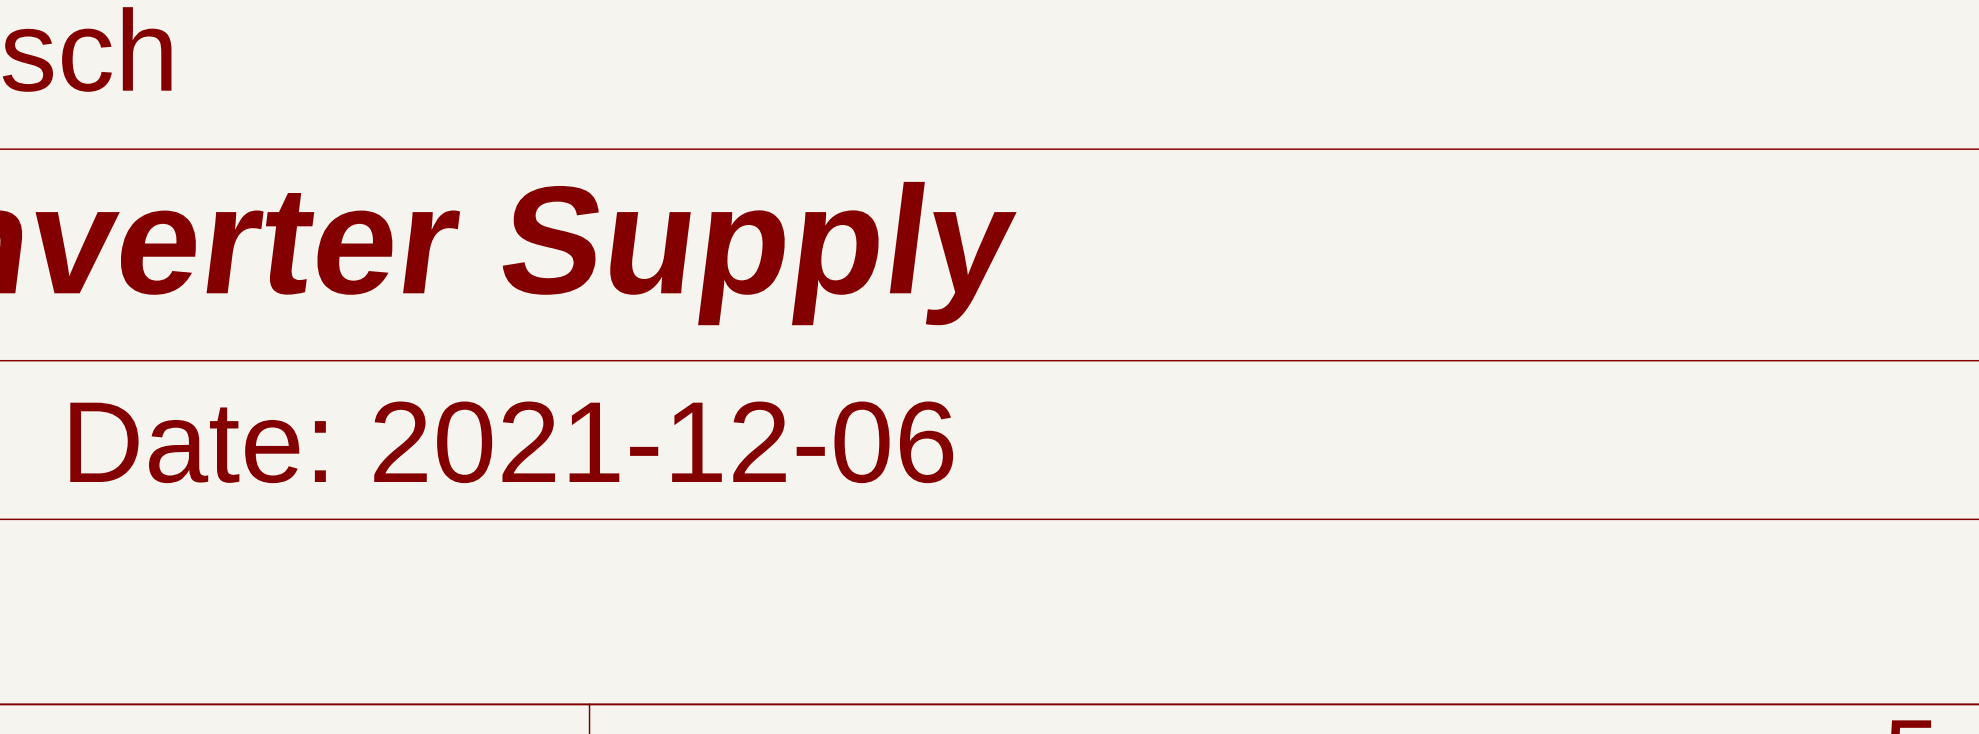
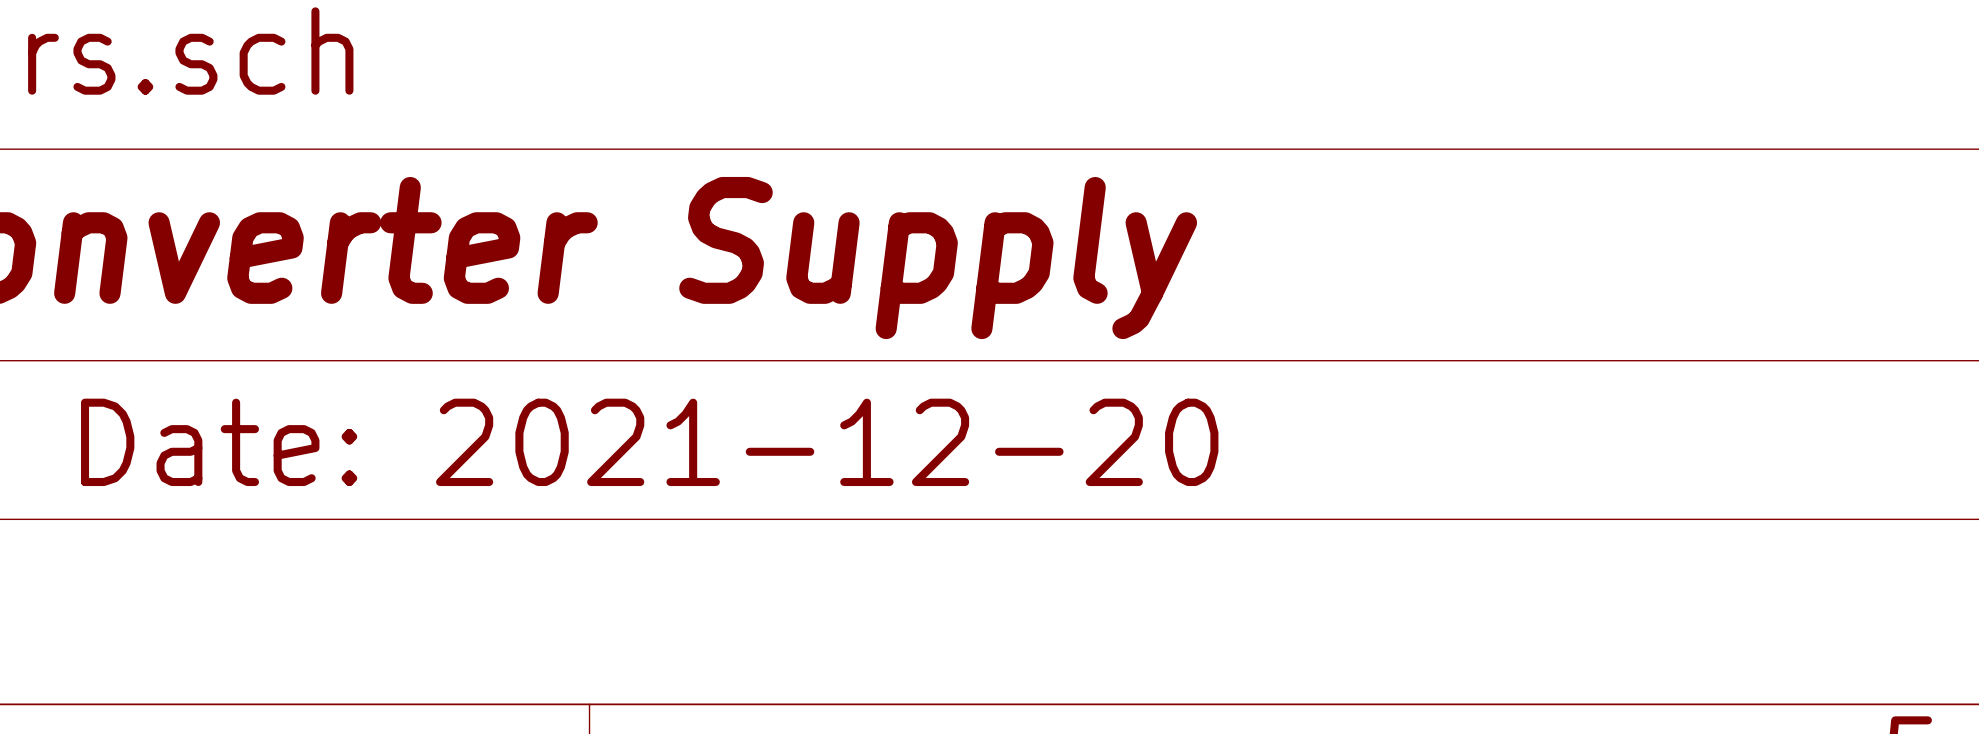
title block: Date: 2021-12-06 (511, 442) -> Date: 2021-12-20 (649, 442)

